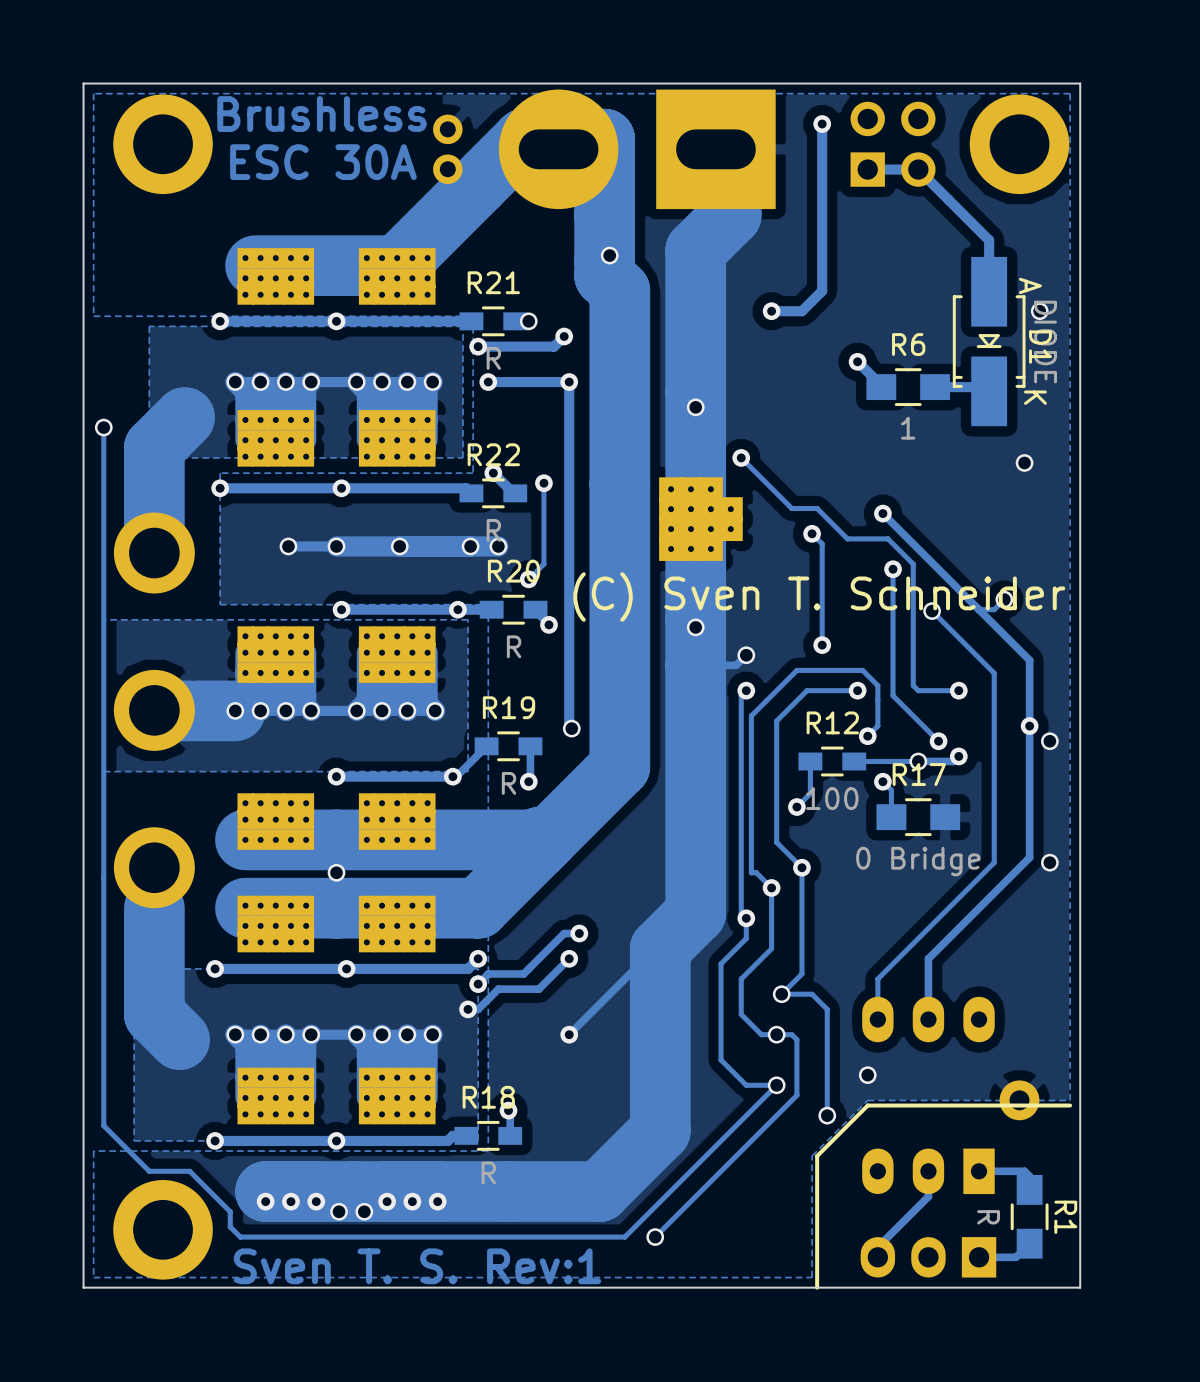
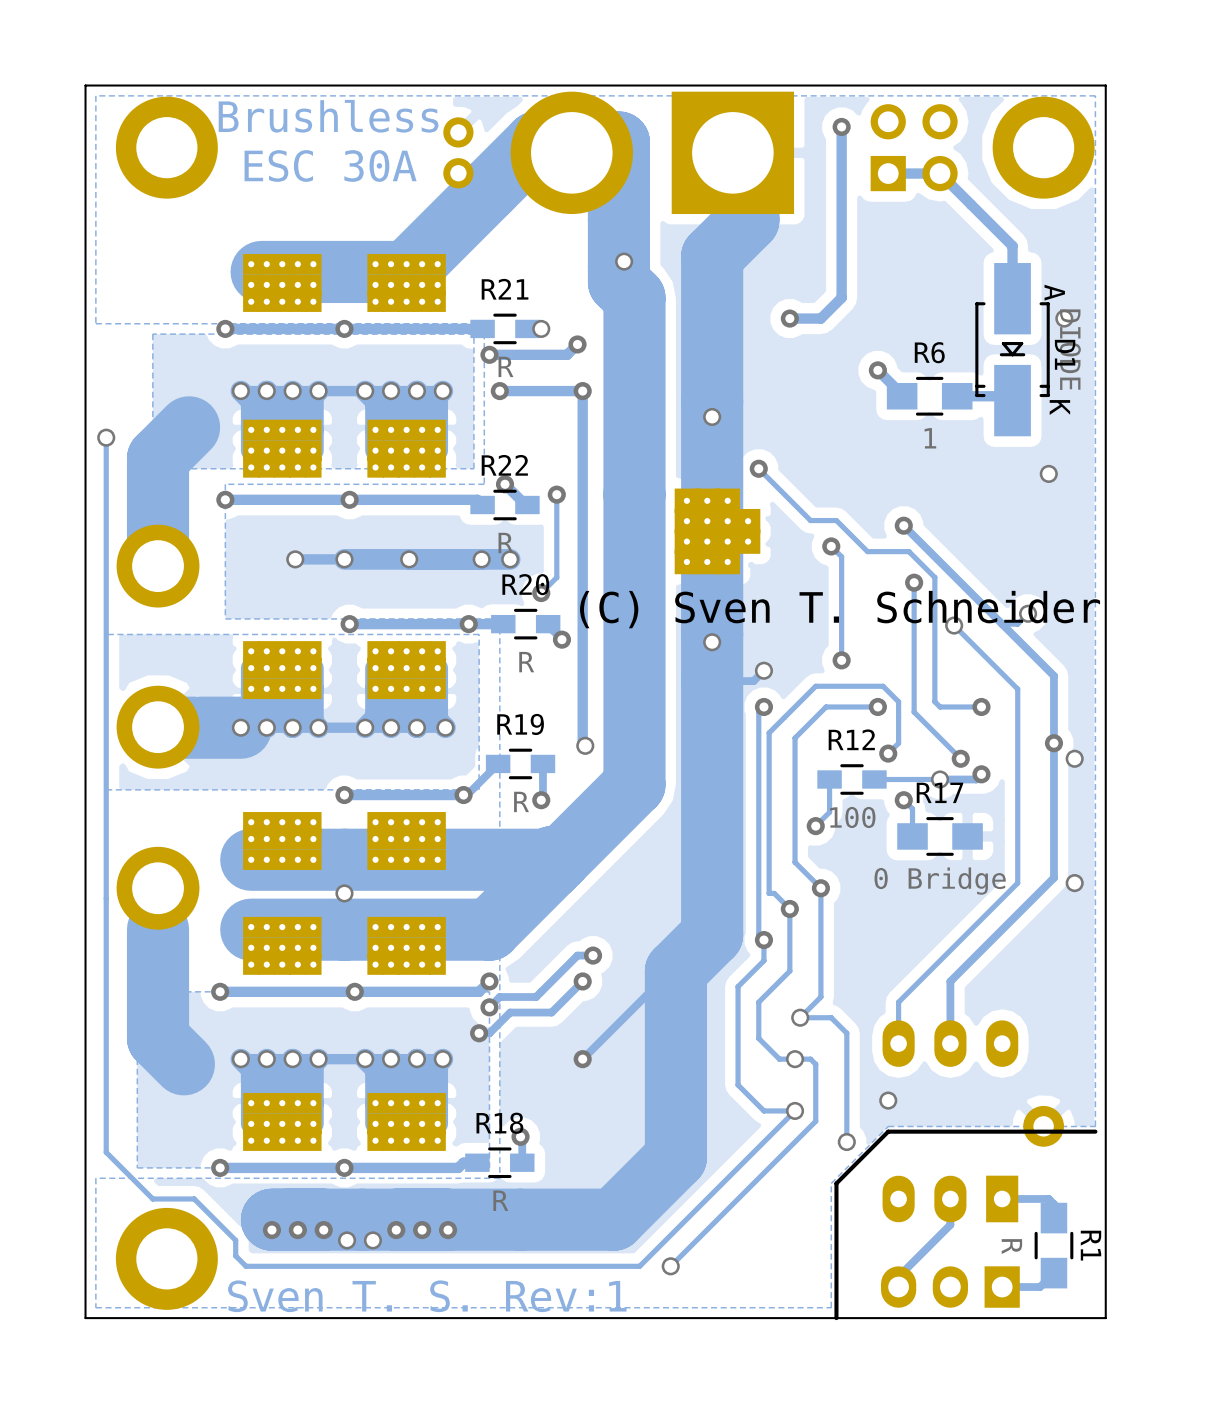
part footprint: [498, 89, 776, 210] -> [510, 91, 795, 215]

